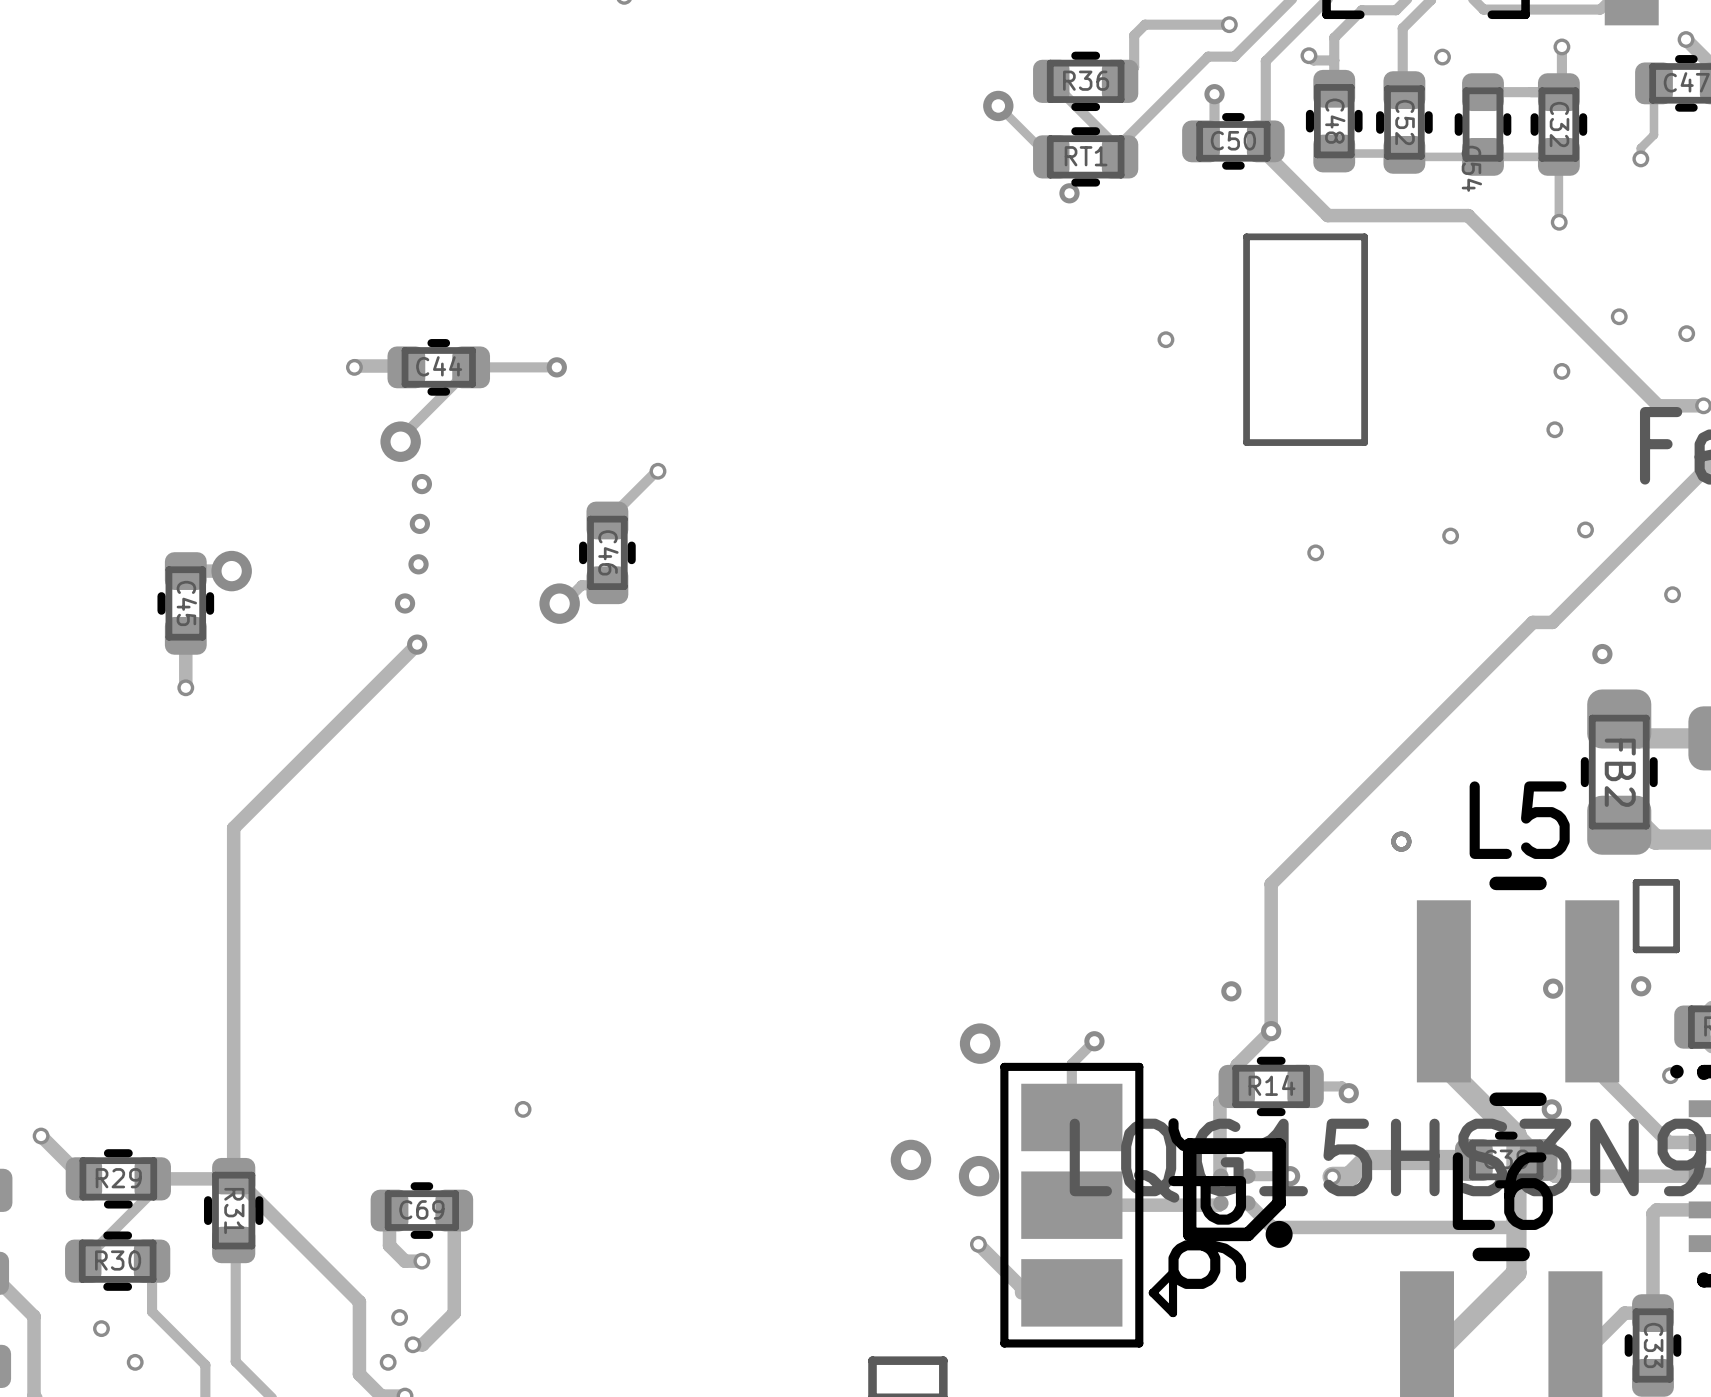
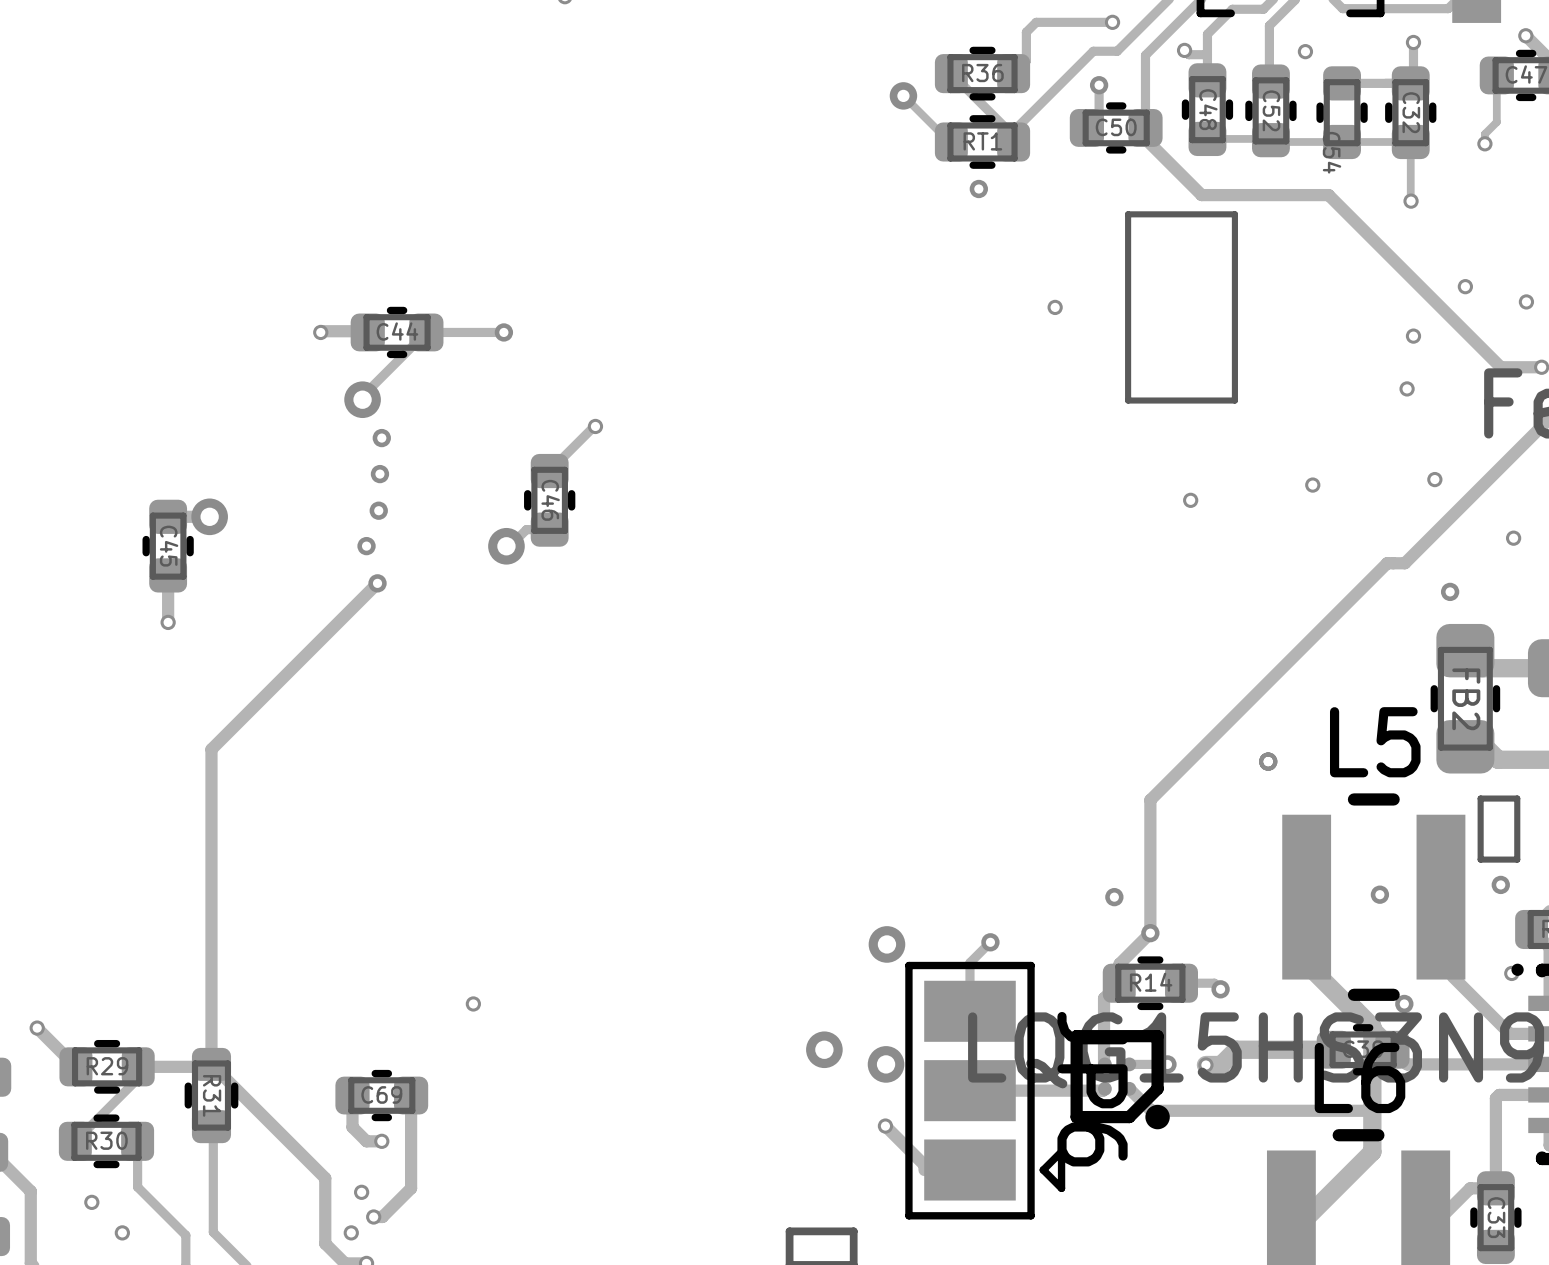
via position: (1069, 193) -> (978, 188)
via position: (1641, 986) -> (1500, 884)
via position: (1553, 988) -> (1379, 894)

